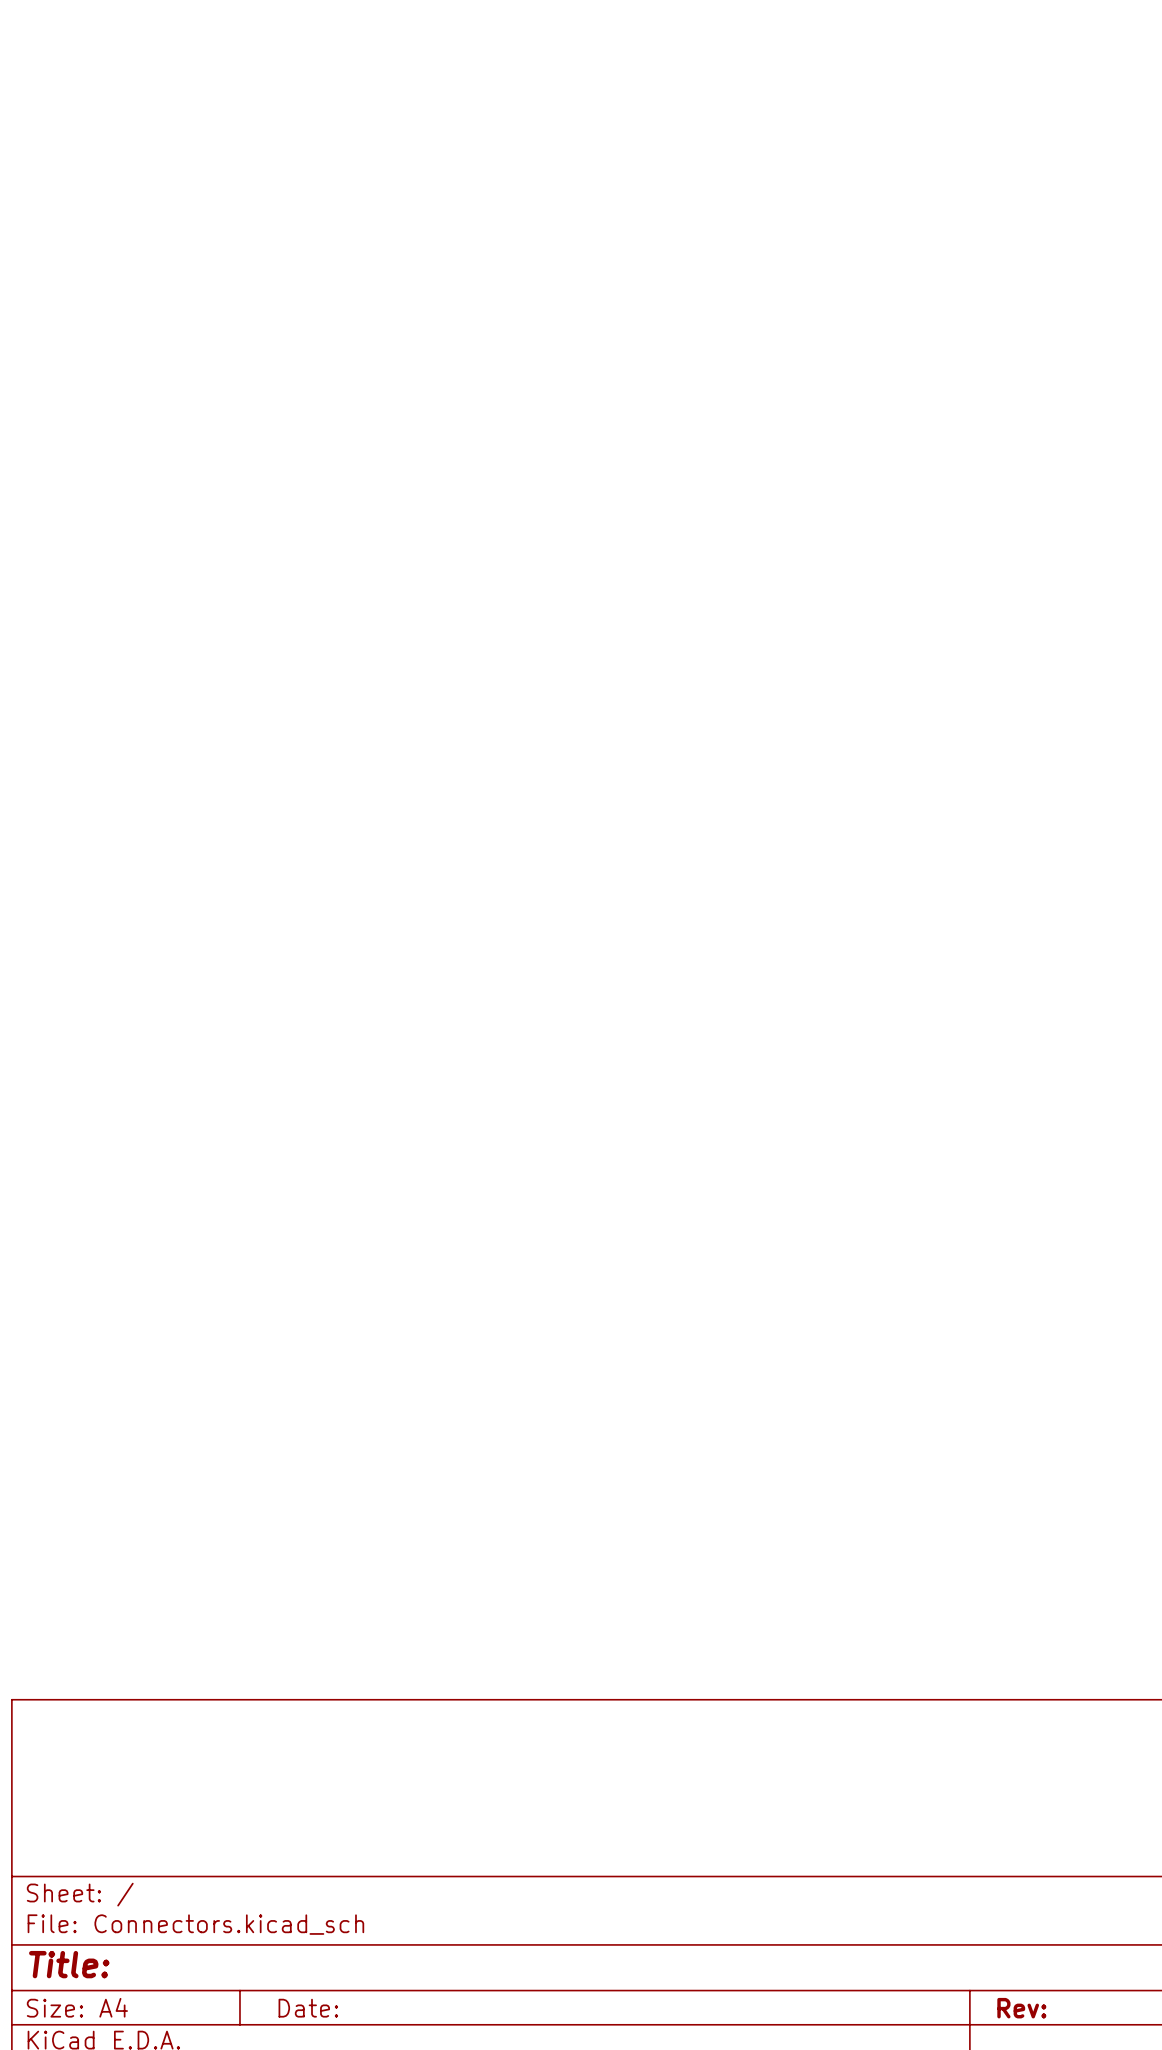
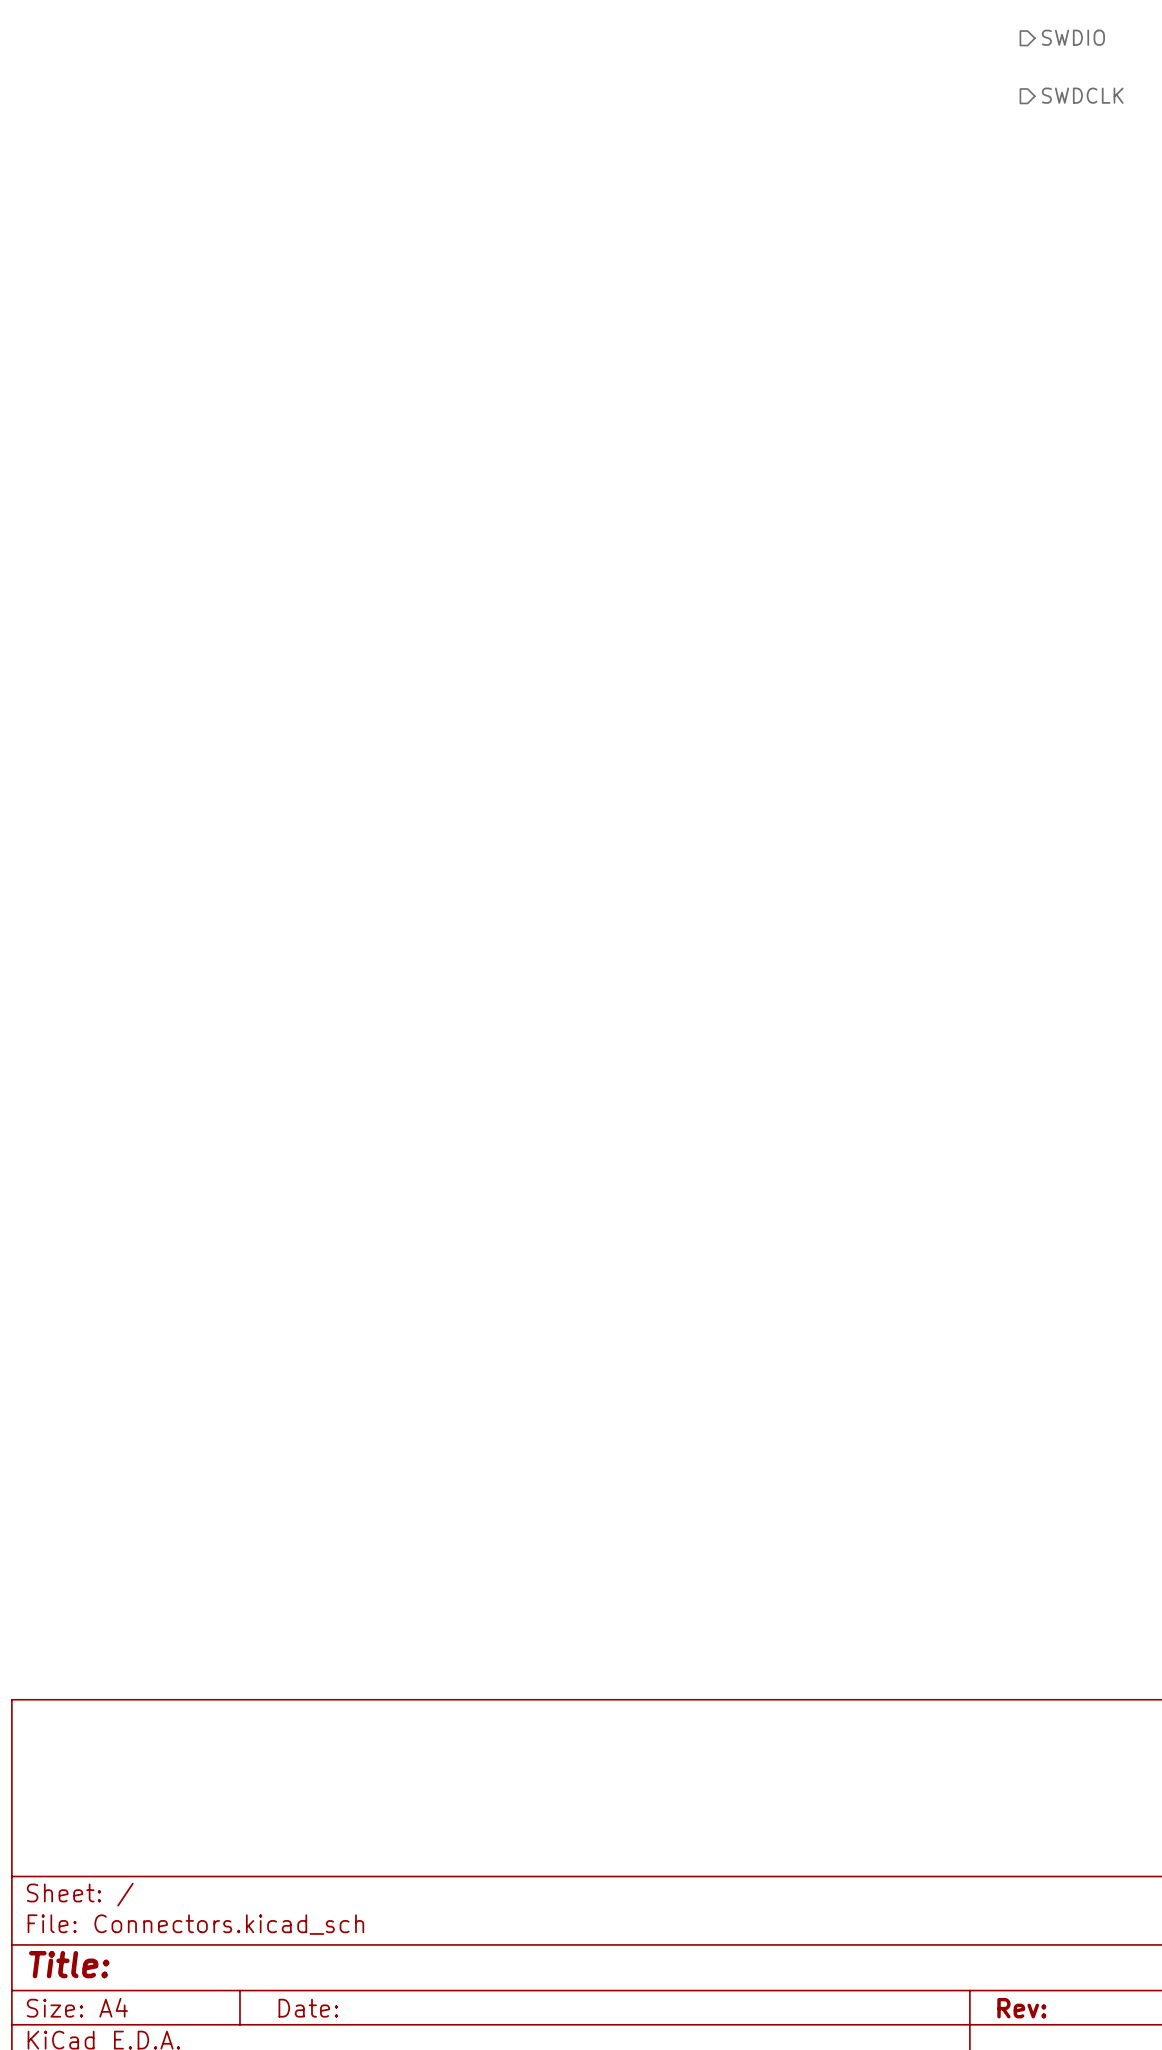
hierarchical label: none -> SWDIO (1073, 37)
hierarchical label: none -> SWDCLK (1082, 95)

